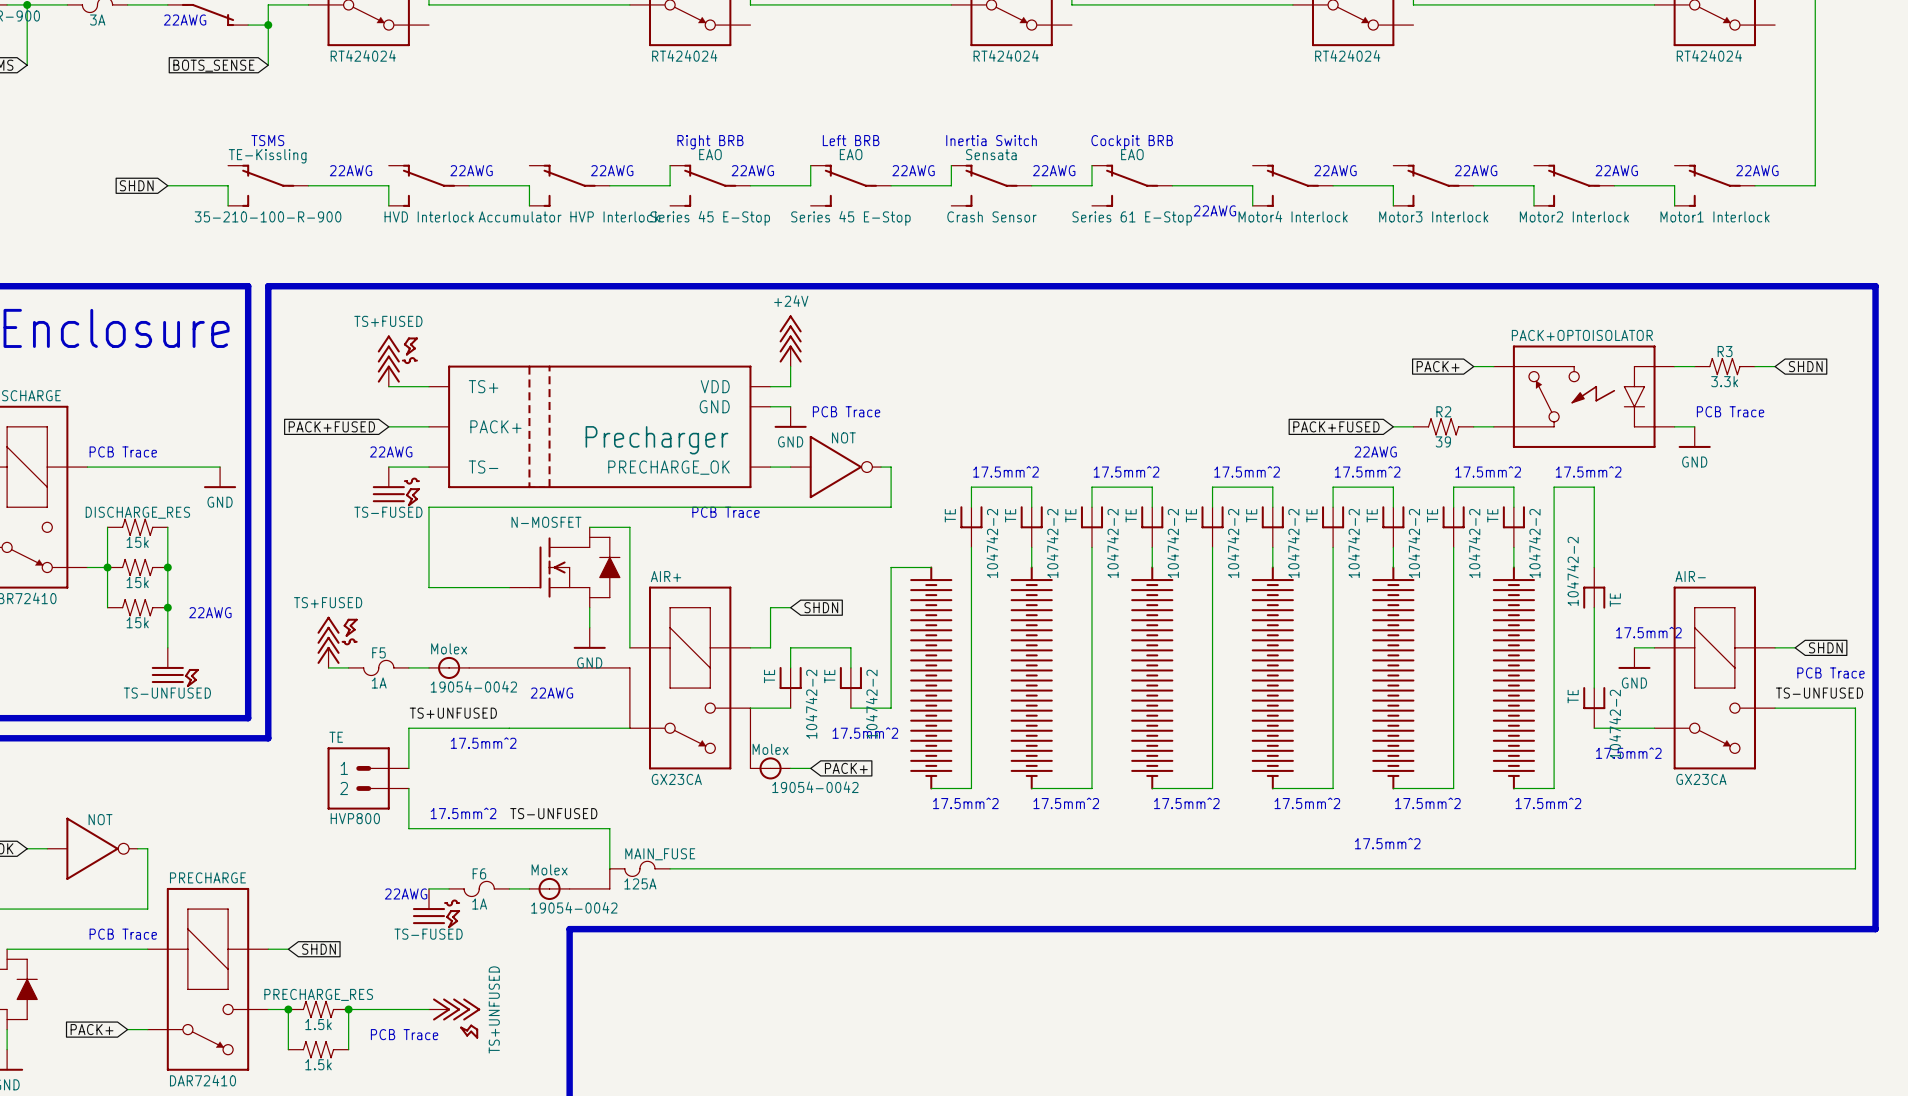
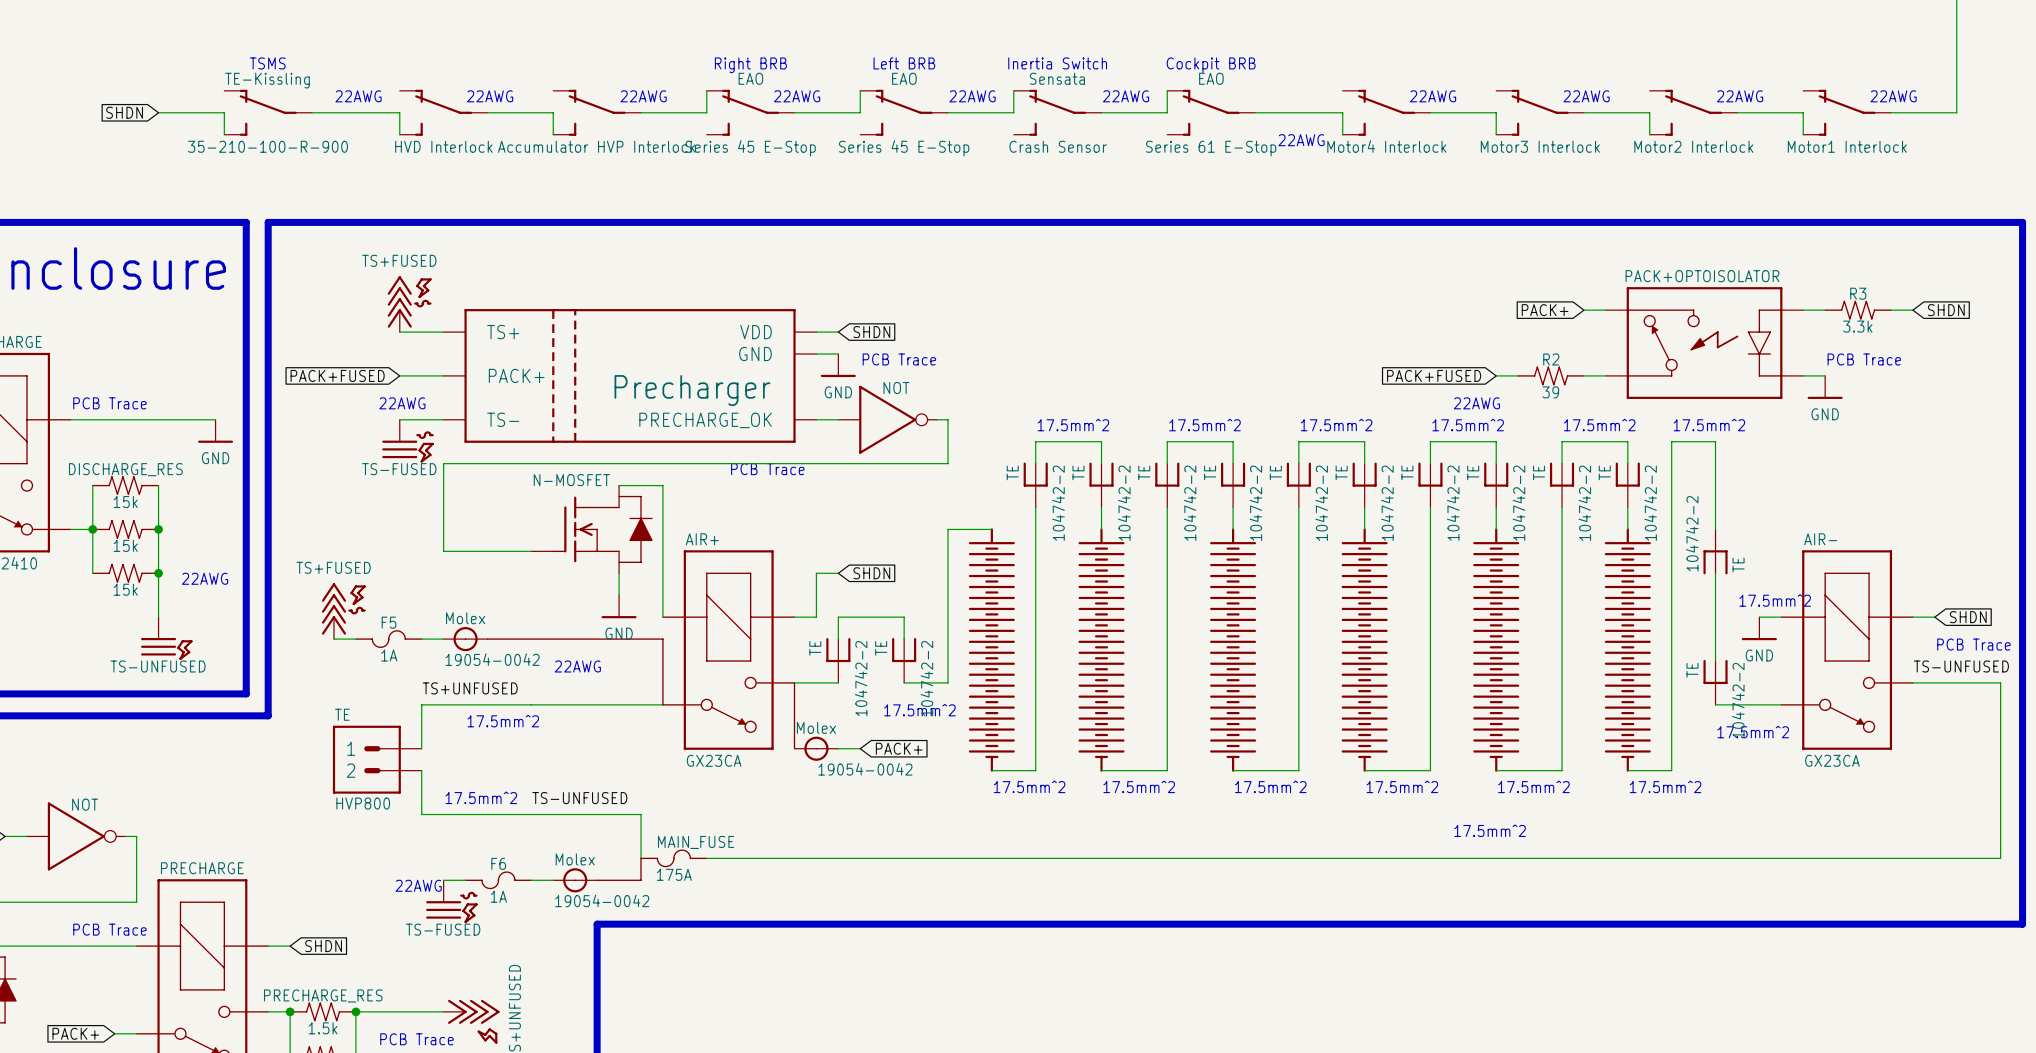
power symbol: +24V (790, 340) -> none
wire: (790, 366) (790, 386) -> none
global label: none -> SHDN (871, 332)
MAIN_FUSE value: 125A (640, 883) -> 175A (674, 874)

